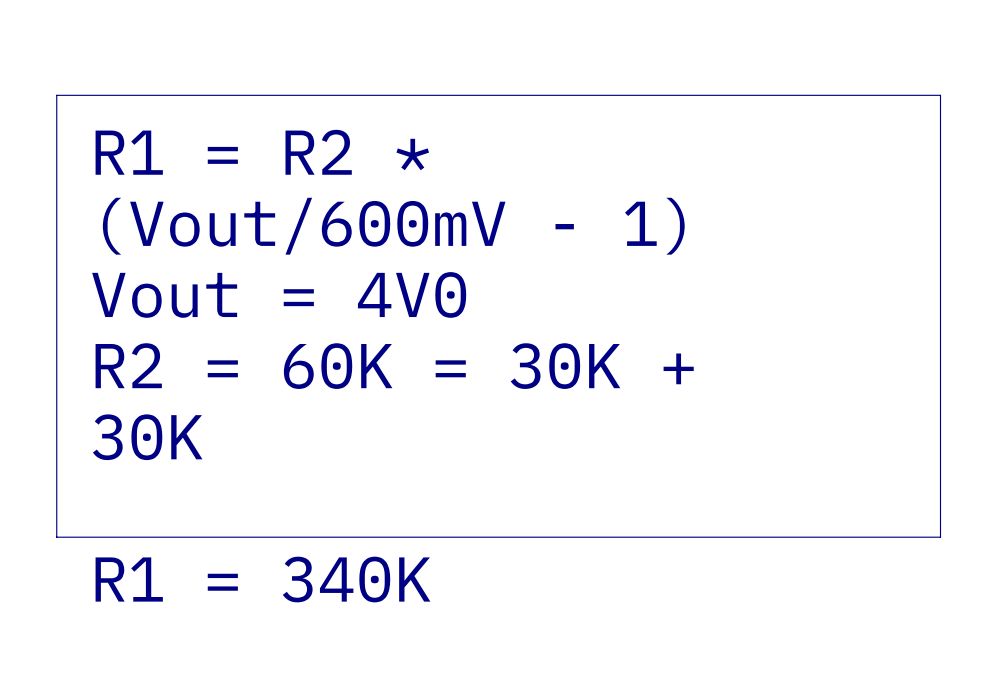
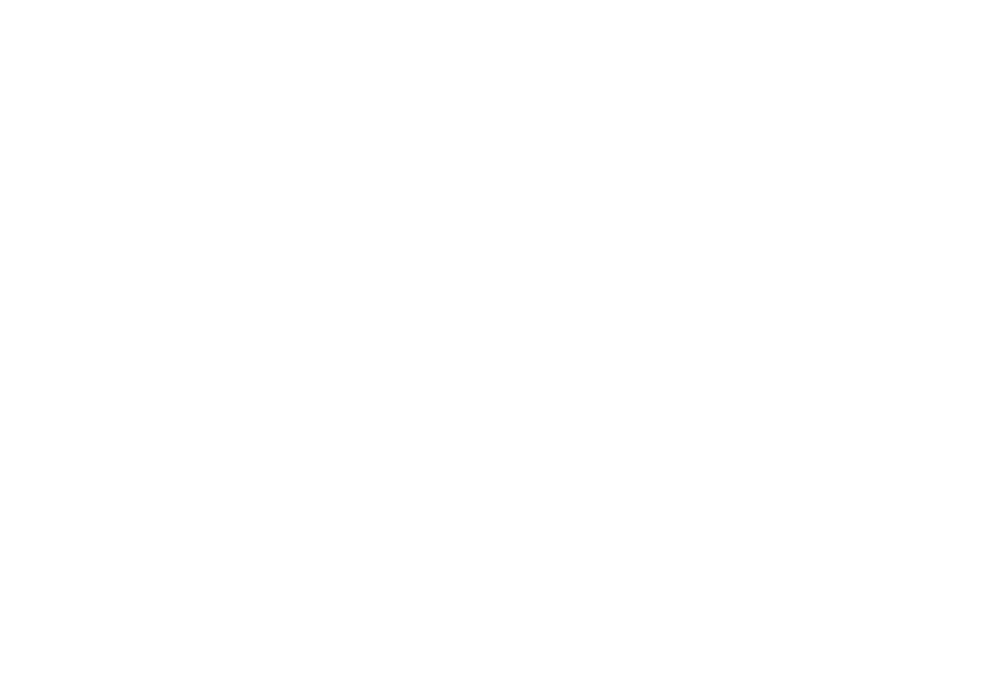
line: (56, 95) (940, 95) (940, 537) (56, 537) (56, 95) -> none
text: R1 = R2 * (262, 152) -> none
text: (Vout/600mV - 1) (393, 226) -> none
text: Vout = 4V0 (279, 294) -> none
text: R2 = 60K = 30K + (394, 366) -> none
text: 30K (147, 437) -> none
text: R1 = 340K (262, 579) -> none

